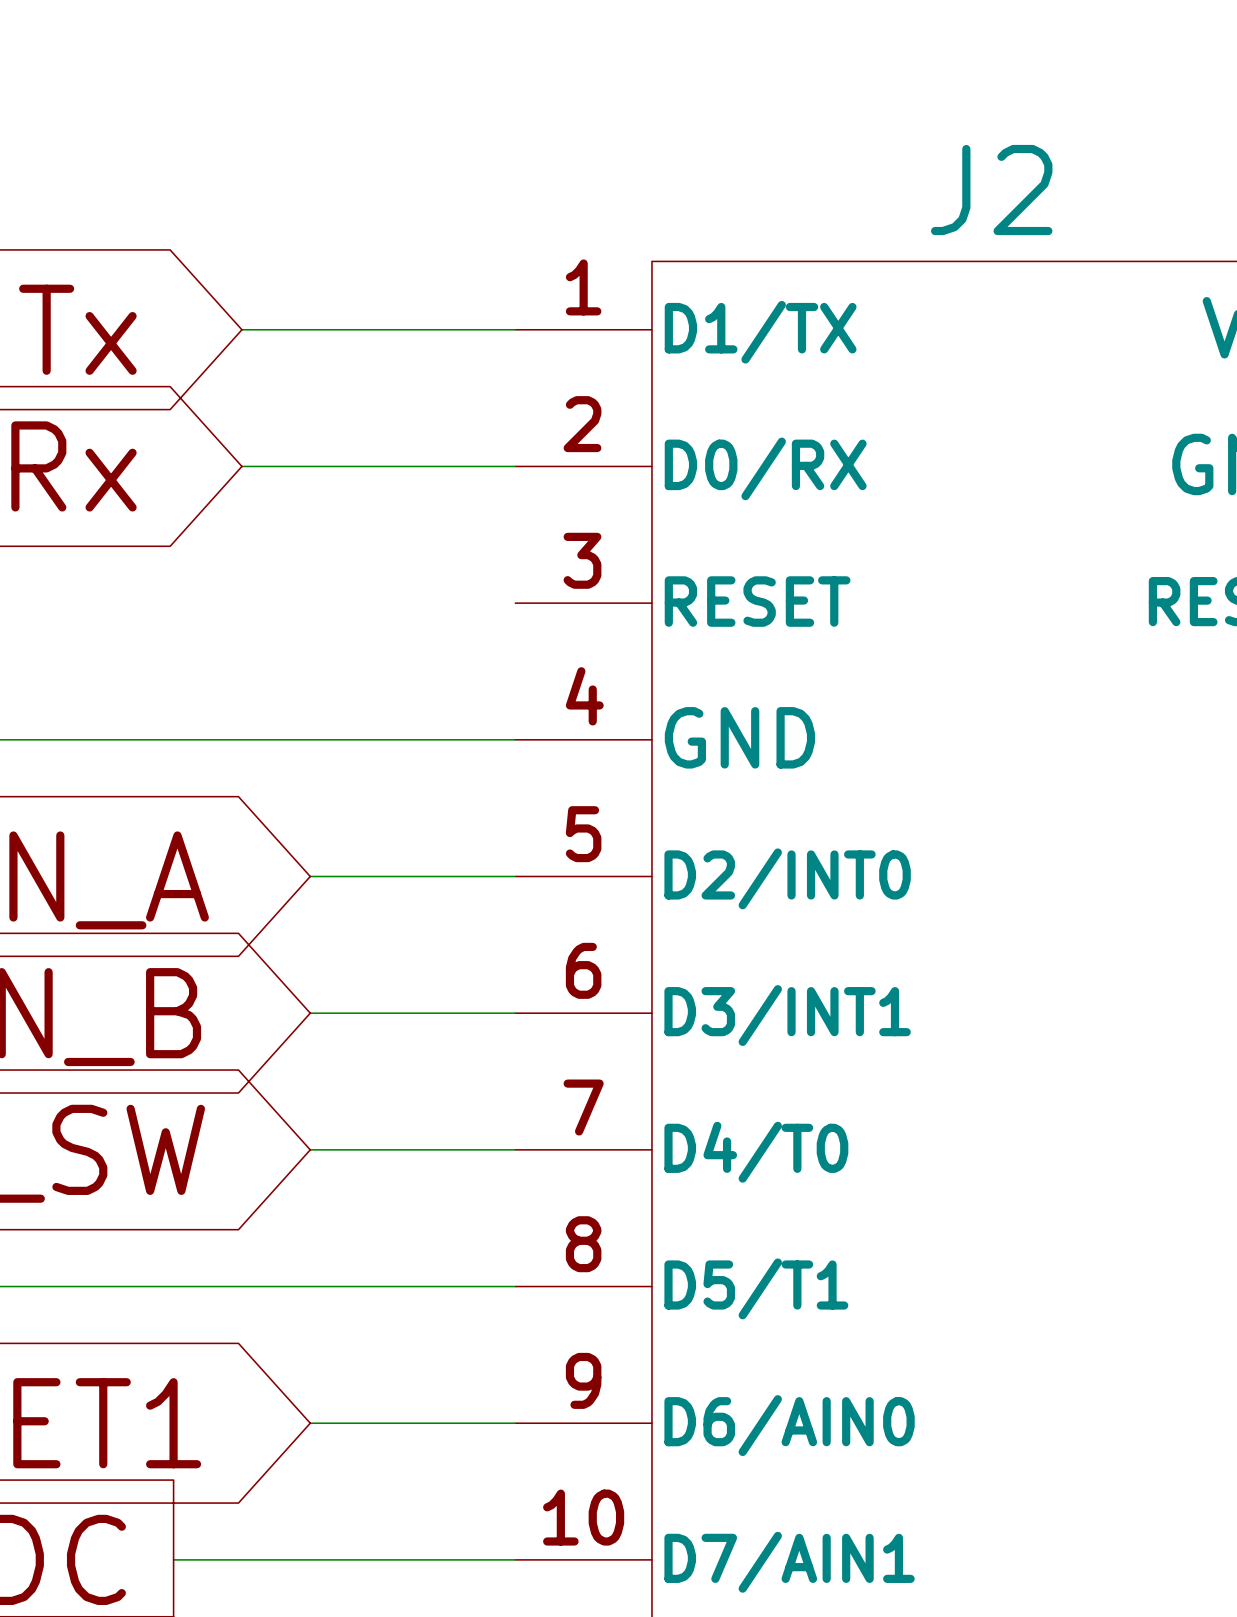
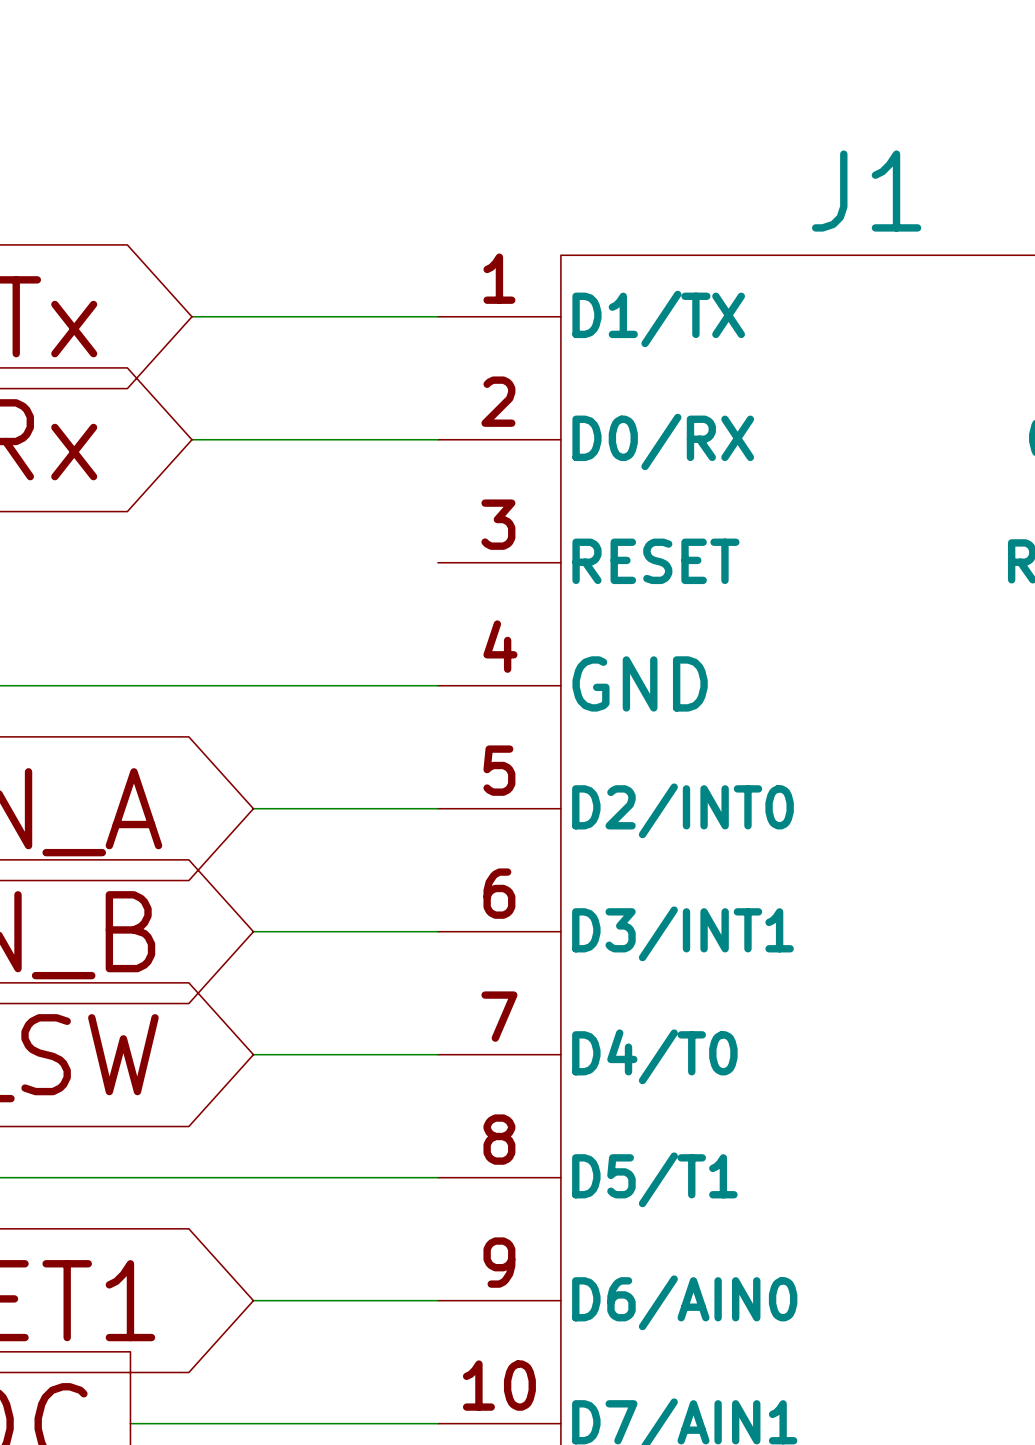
J2 name: J2 (991, 190) -> J1 (866, 191)

